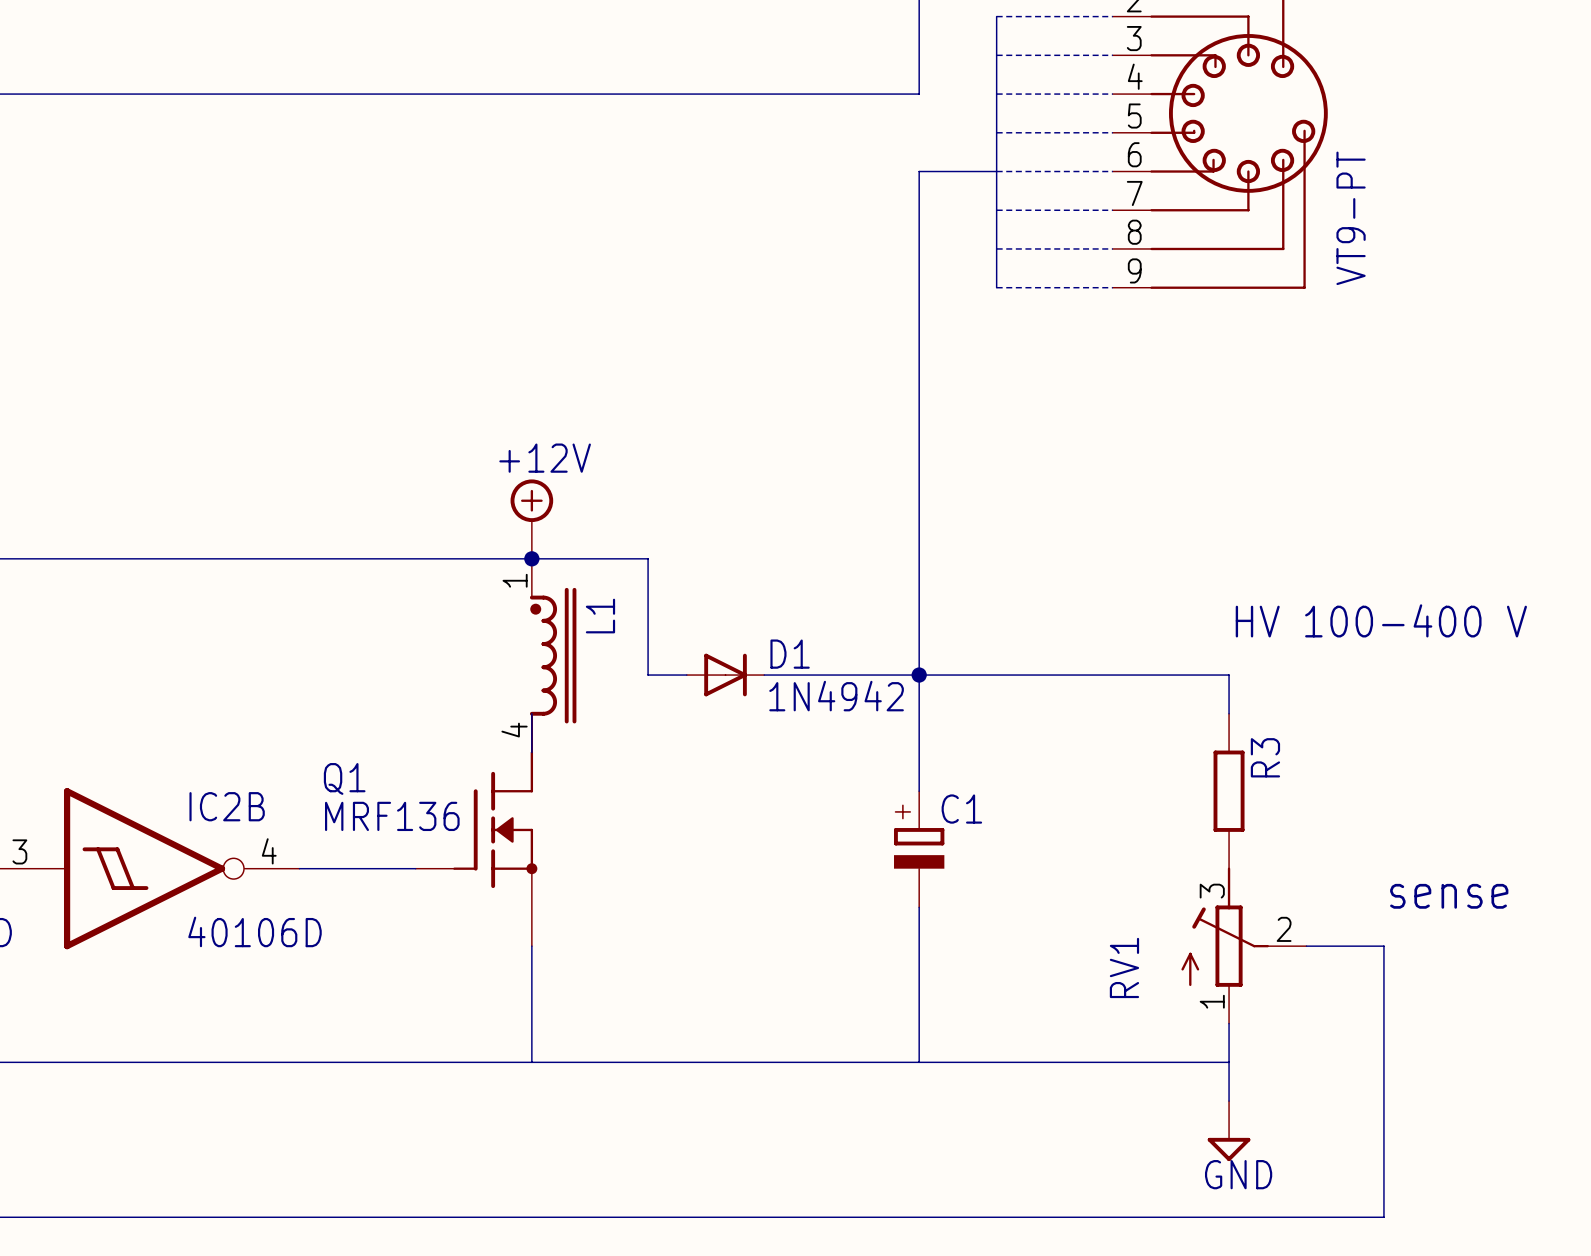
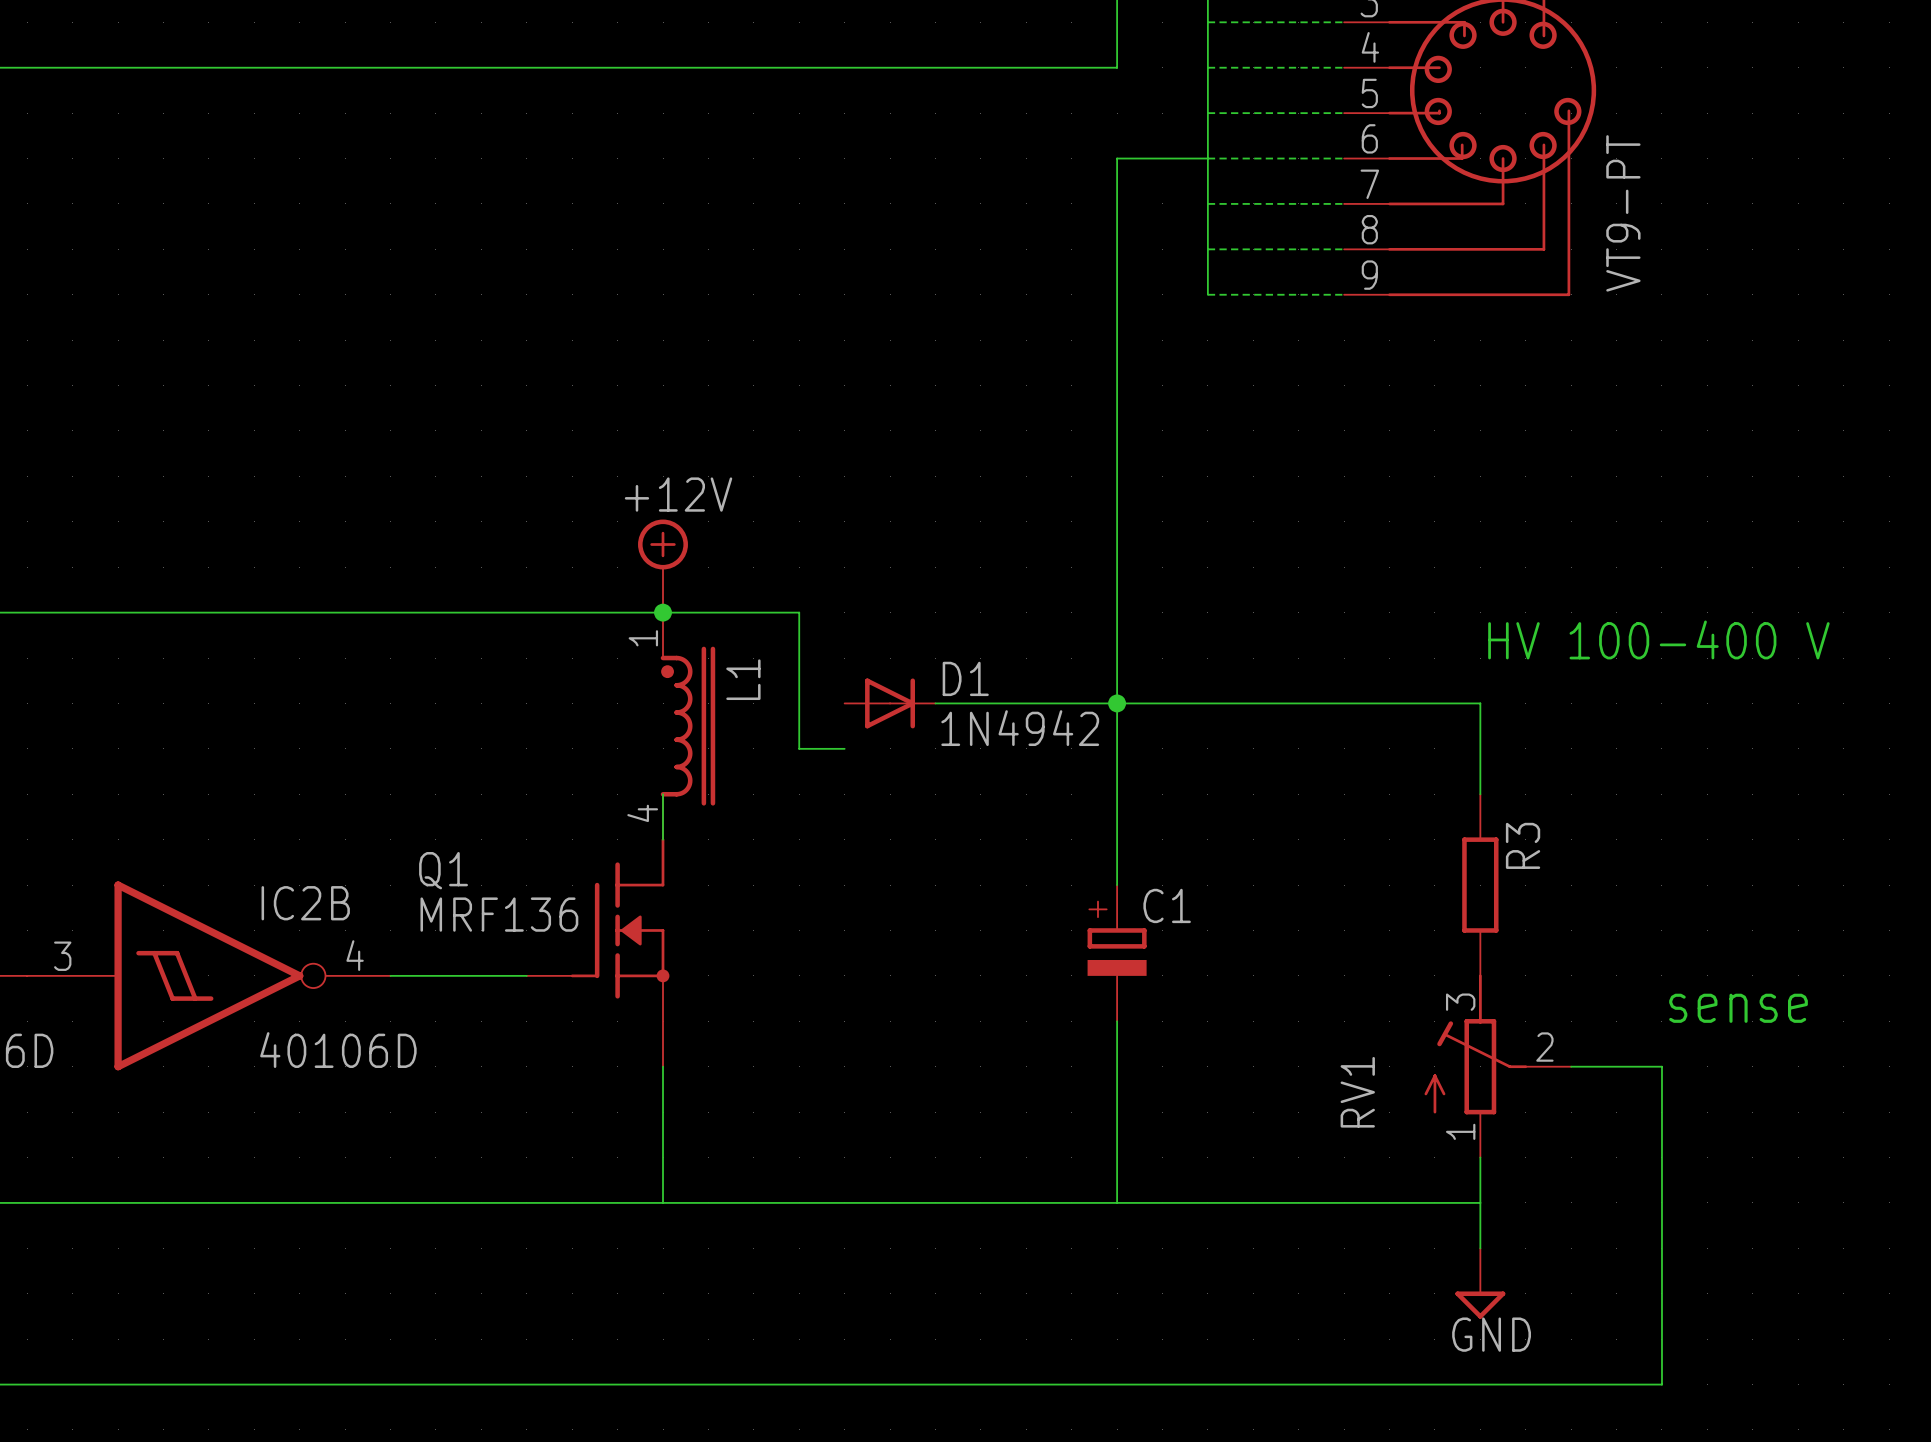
text position: HV 100-400 V (1381, 620) -> HV 100-400 V (1658, 639)
D1 position: (725, 675) -> (890, 703)
wire: (764, 675) (1229, 675) -> (935, 703) (1480, 703) (1480, 748)
junction position: (919, 675) -> (1117, 703)

